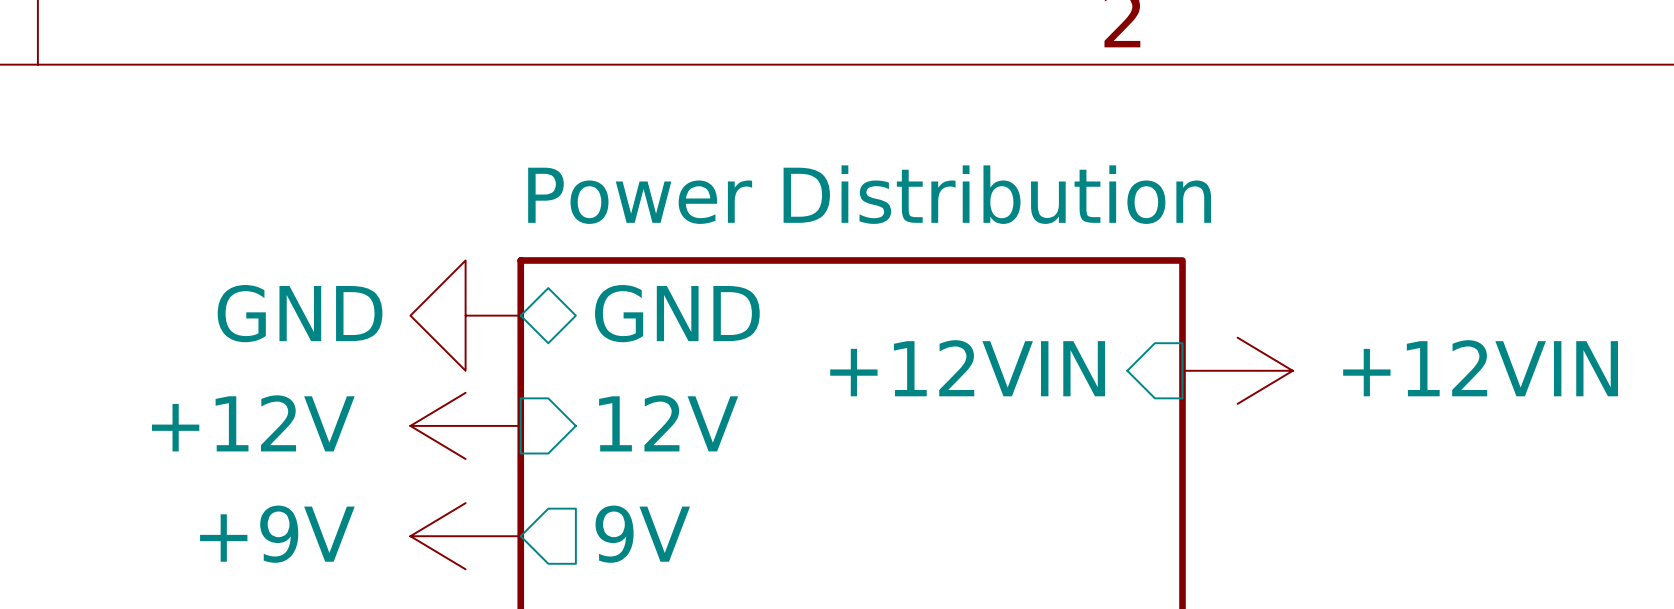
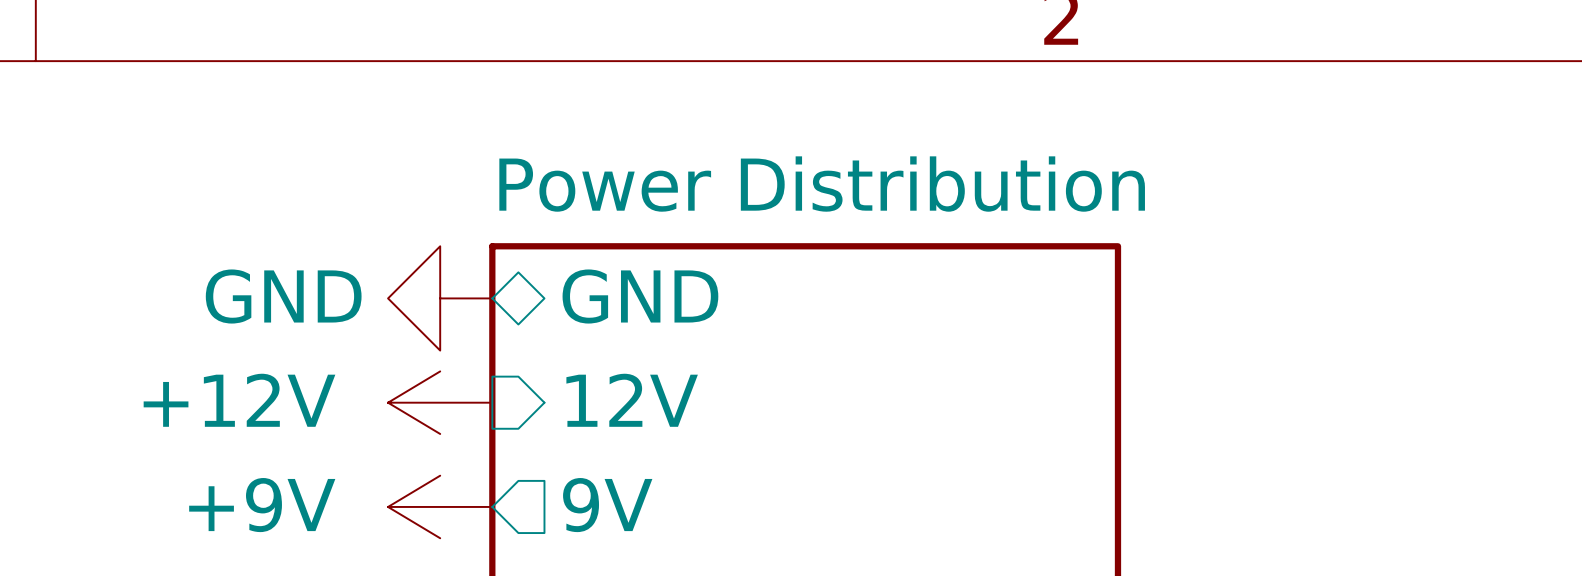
sheet pin: +12VIN (967, 368) -> none
power symbol: +12VIN (1237, 370) -> none

